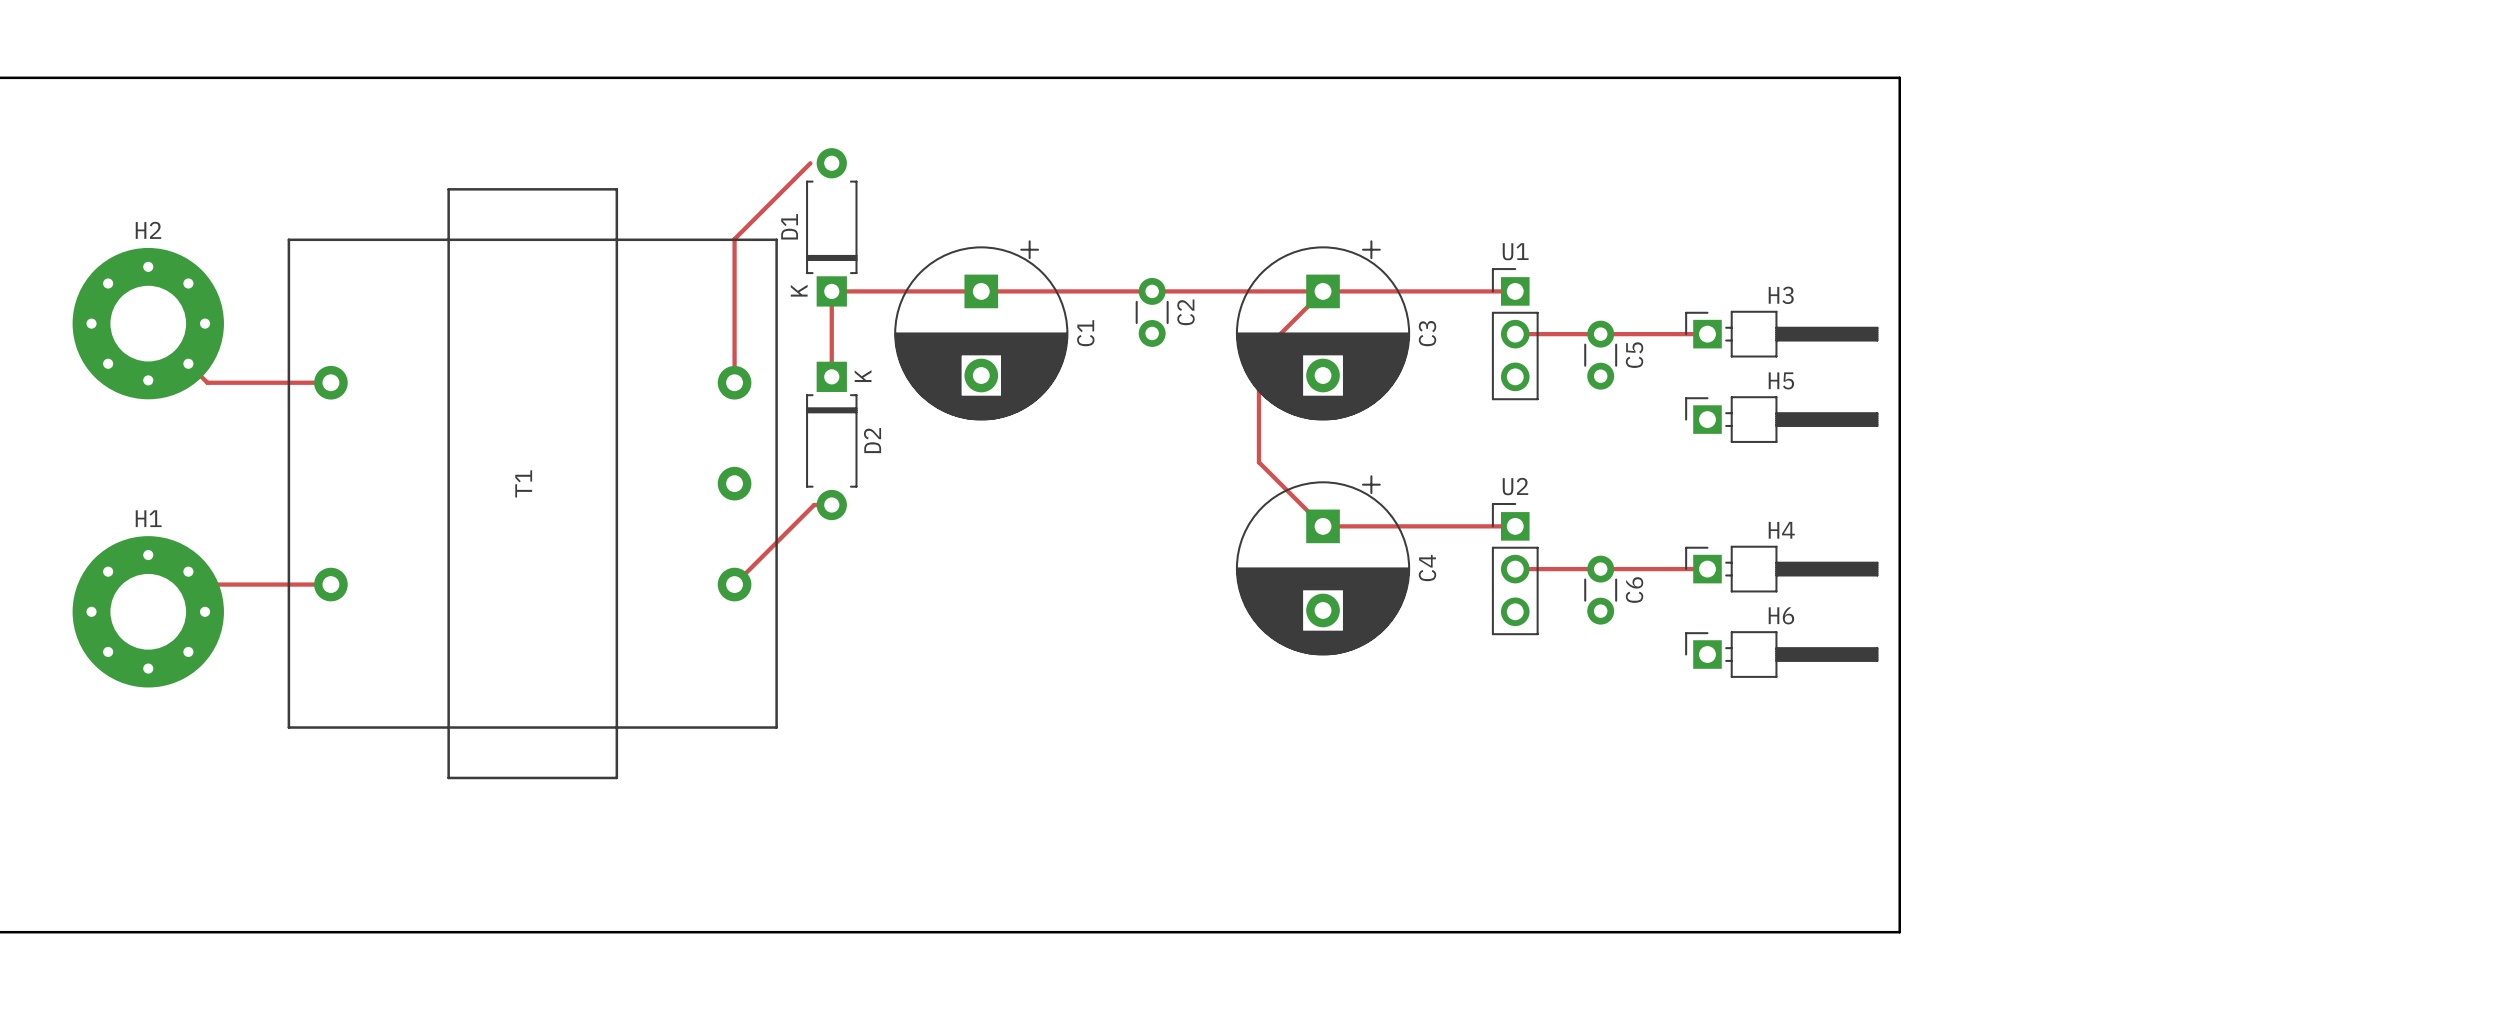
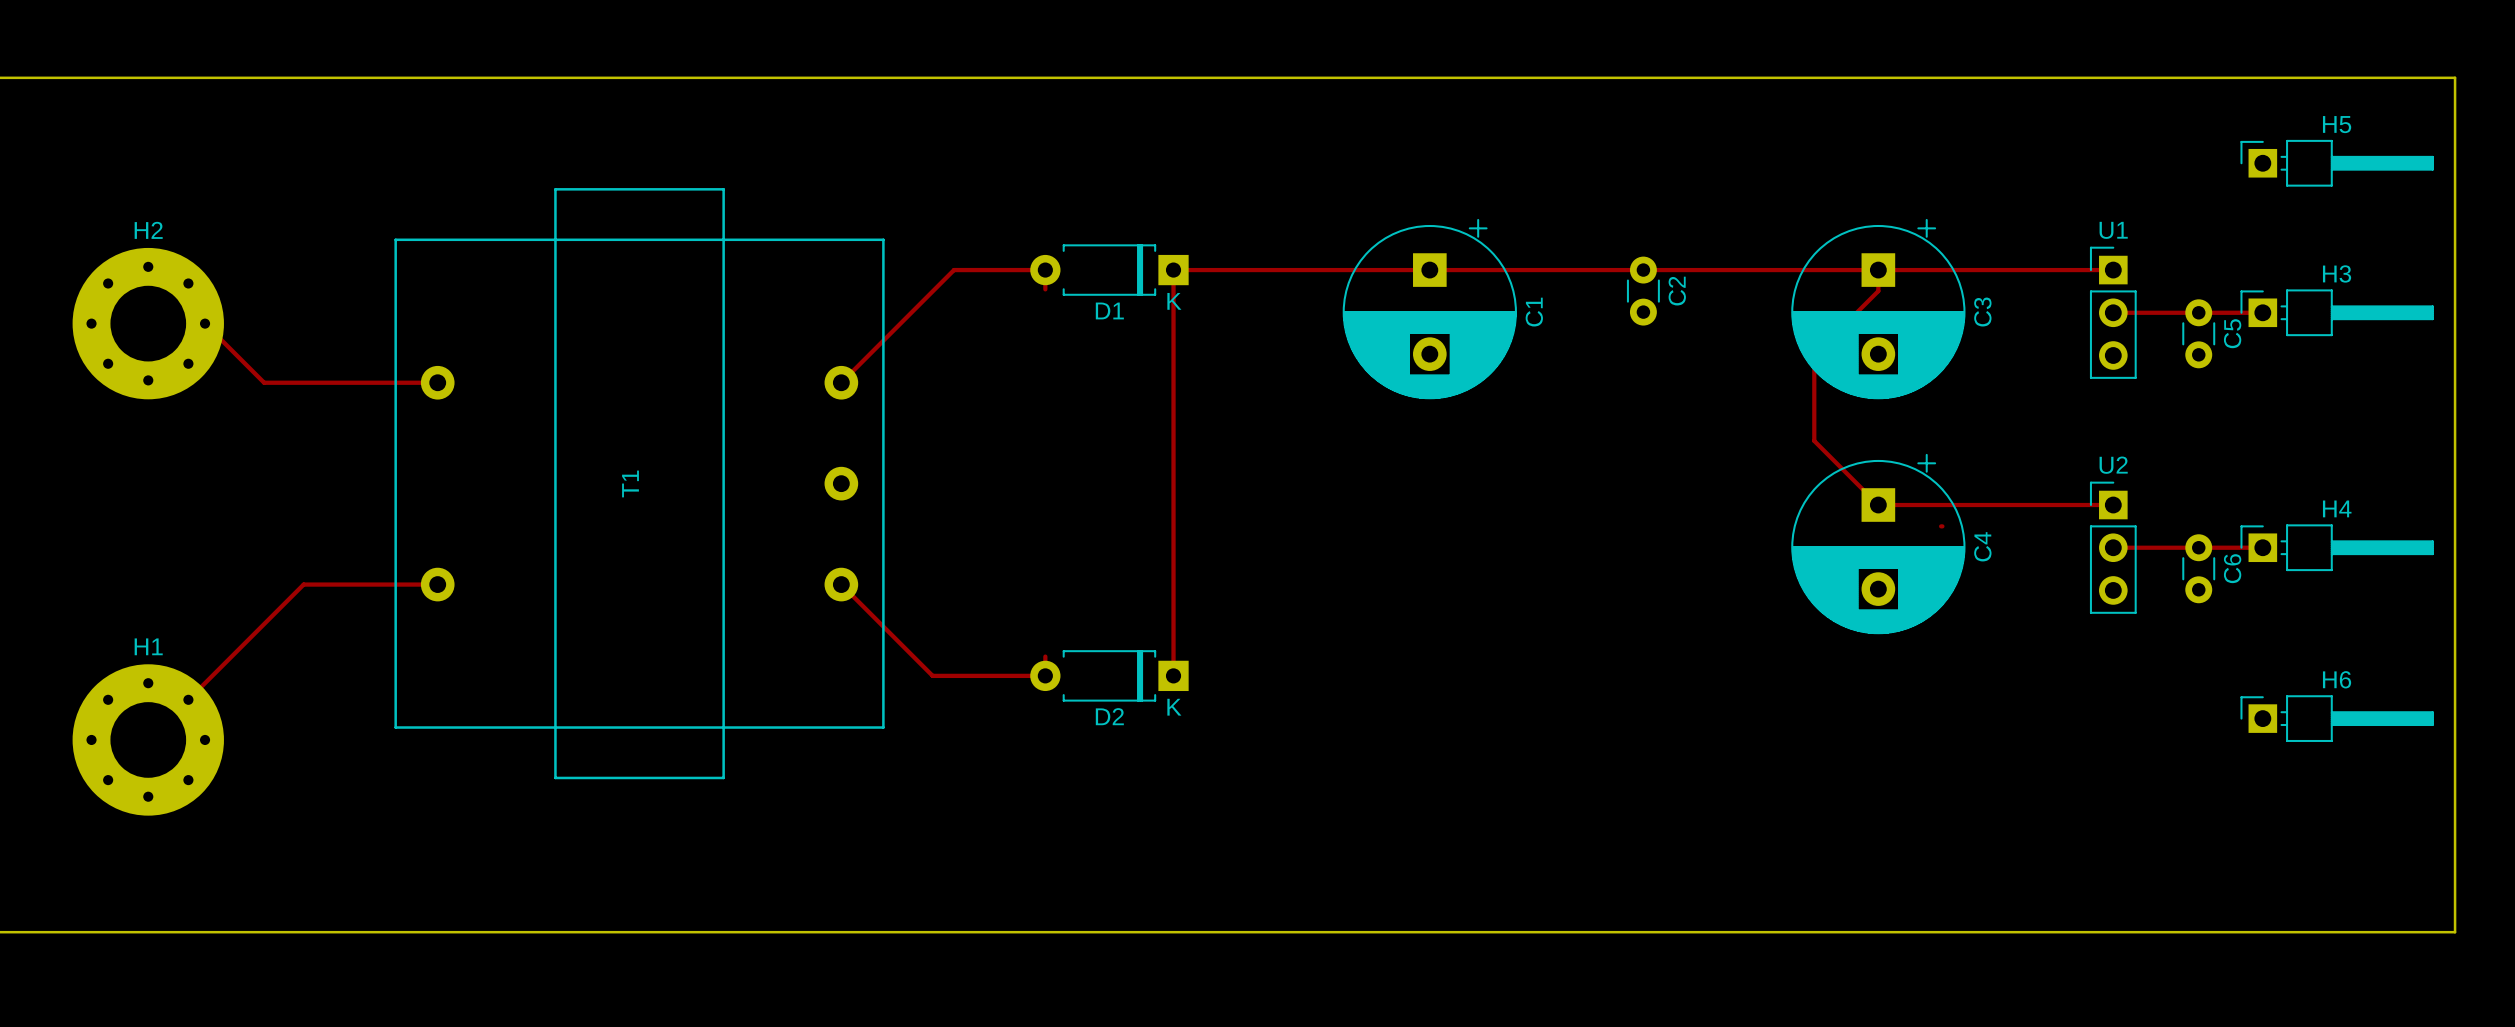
board edge: (1899, 77) (1899, 932) -> (1899, 77) (2455, 77) (2455, 932) (1899, 932)
track: (810, 163) (734, 239) (734, 382) -> none
D1 rotation: 0° (831, 227) -> 90° counterclockwise (1109, 270)
D1 position: (831, 227) -> (1109, 270)
track: none -> (1878, 270) (1878, 291) (1814, 355) (1814, 440) (1878, 505) (2113, 505)
track: none -> (2113, 270) (1173, 270) (1173, 675)
track: none -> (1045, 289) (1045, 270) (954, 270) (841, 382)
track: (1323, 291) (1258, 355) (1258, 462) (1323, 526) (1515, 526) -> none
track: (1515, 291) (831, 291) (831, 376) -> none
C2 position: (1152, 312) -> (1643, 291)
track: none -> (2113, 312) (2262, 312)
track: (148, 323) (207, 382) (264, 382) -> (212, 331) (264, 382)
C1 position: (981, 330) -> (1429, 309)
C3 position: (1323, 330) -> (1878, 309)
track: (1515, 334) (1707, 334) -> none
U1 position: (1515, 334) -> (2113, 312)
H3 position: (1781, 334) -> (2337, 312)
C5 position: (1600, 355) -> (2198, 333)
track: none -> (330, 382) (437, 382)
H5 position: (1781, 419) -> (2337, 163)
D2 rotation: 0° (831, 440) -> 90° clockwise (1109, 675)
D2 position: (831, 440) -> (1109, 675)
T1 position: (532, 483) -> (639, 483)
track: (831, 505) (814, 505) (734, 584) -> none
track: none -> (1941, 526) (1942, 526)
track: none -> (2113, 547) (2262, 547)
C4 position: (1323, 565) -> (1878, 544)
track: (1515, 569) (1707, 569) -> none
U2 position: (1515, 569) -> (2113, 547)
H4 position: (1781, 569) -> (2337, 547)
track: (303, 584) (175, 584) (148, 611) -> (303, 584) (188, 699)
track: none -> (330, 584) (437, 584)
track: none -> (841, 584) (932, 675) (1045, 675) (1045, 656)
C6 position: (1600, 590) -> (2198, 568)
H1 position: (148, 611) -> (148, 739)
H6 position: (1781, 654) -> (2337, 718)

